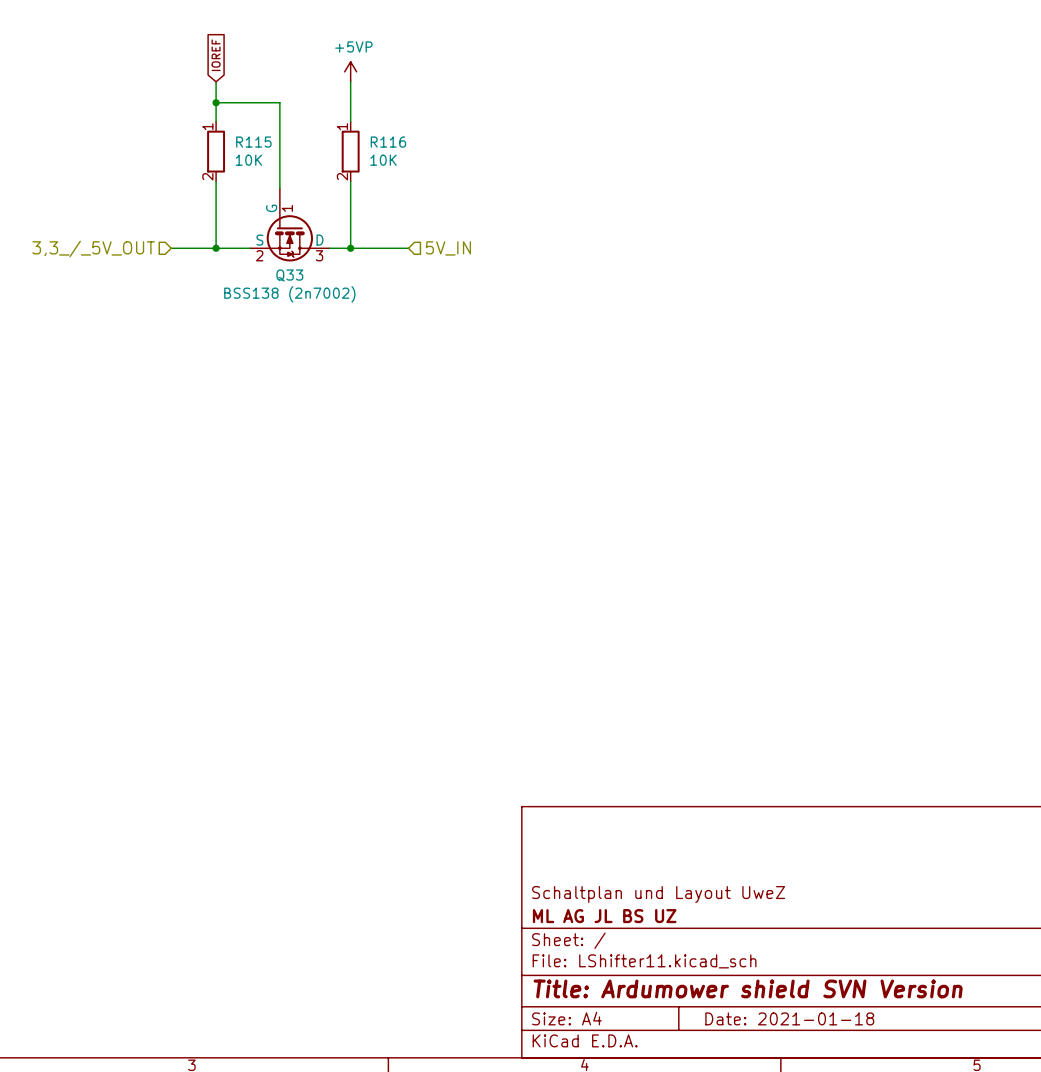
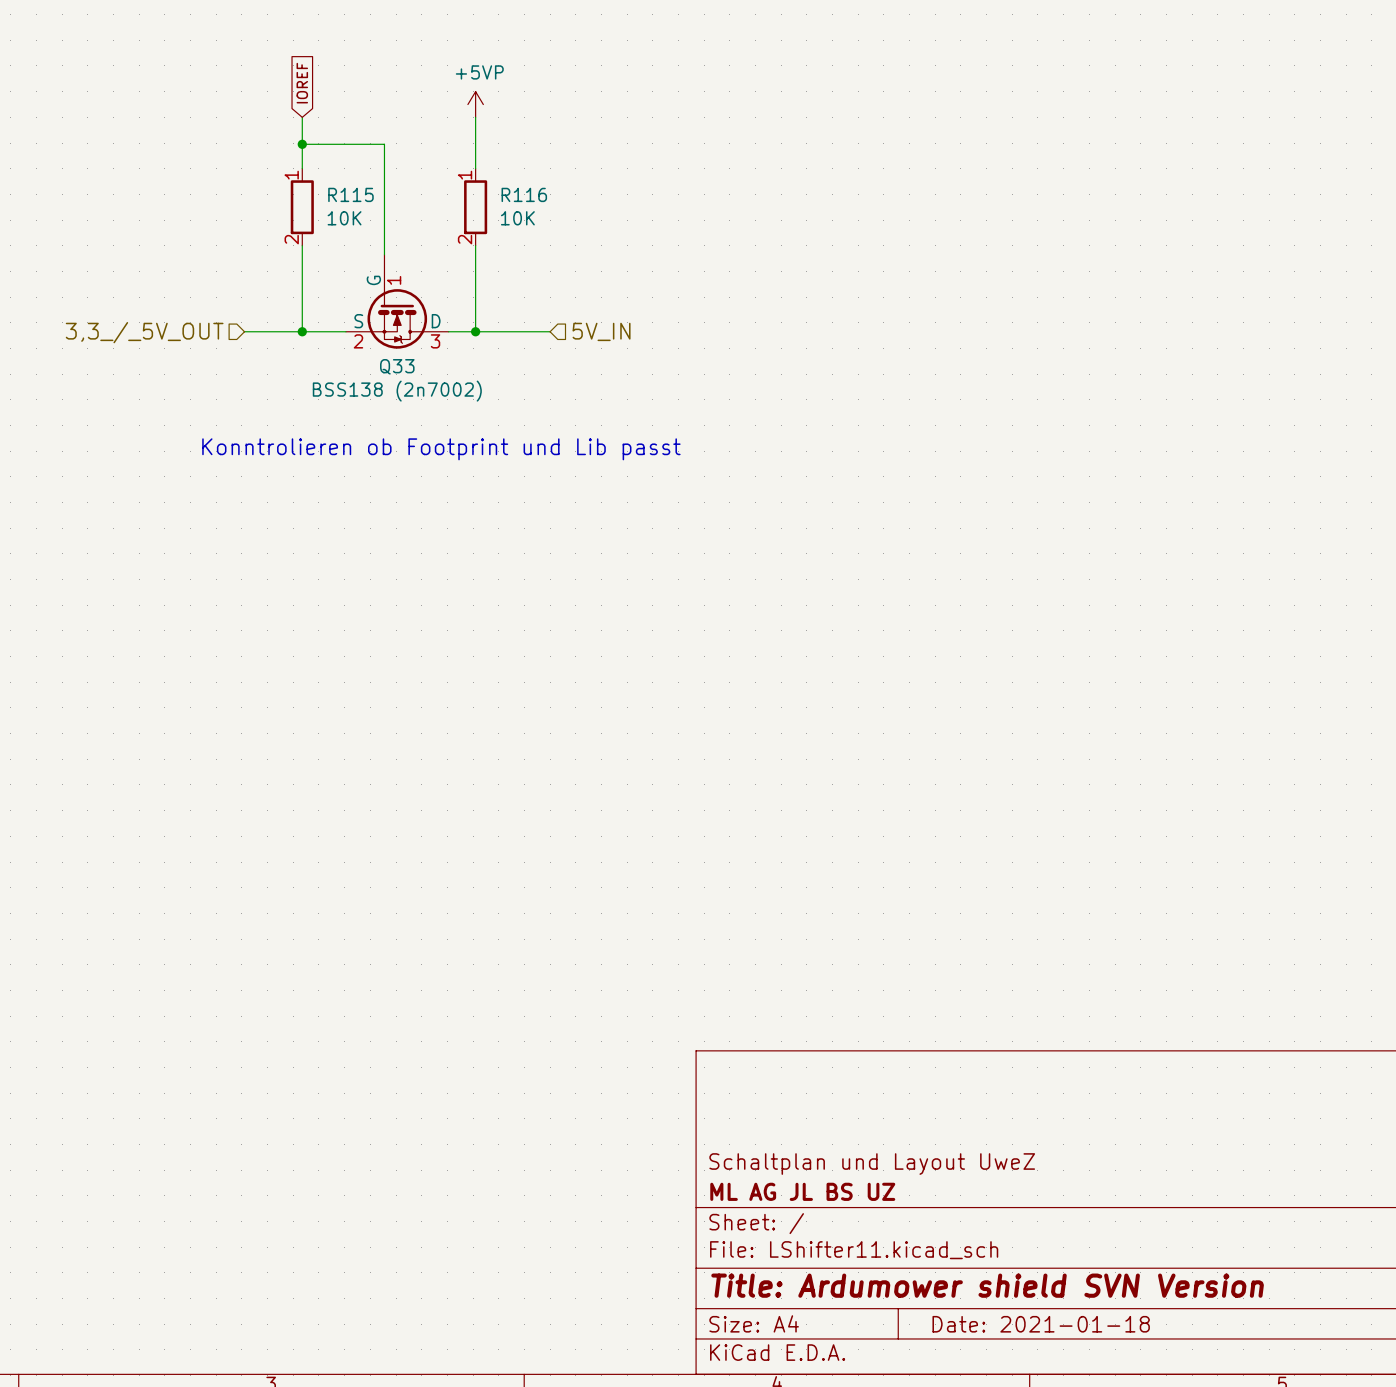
text: none -> Konntrolieren ob Footprint und Lib passt (441, 449)

